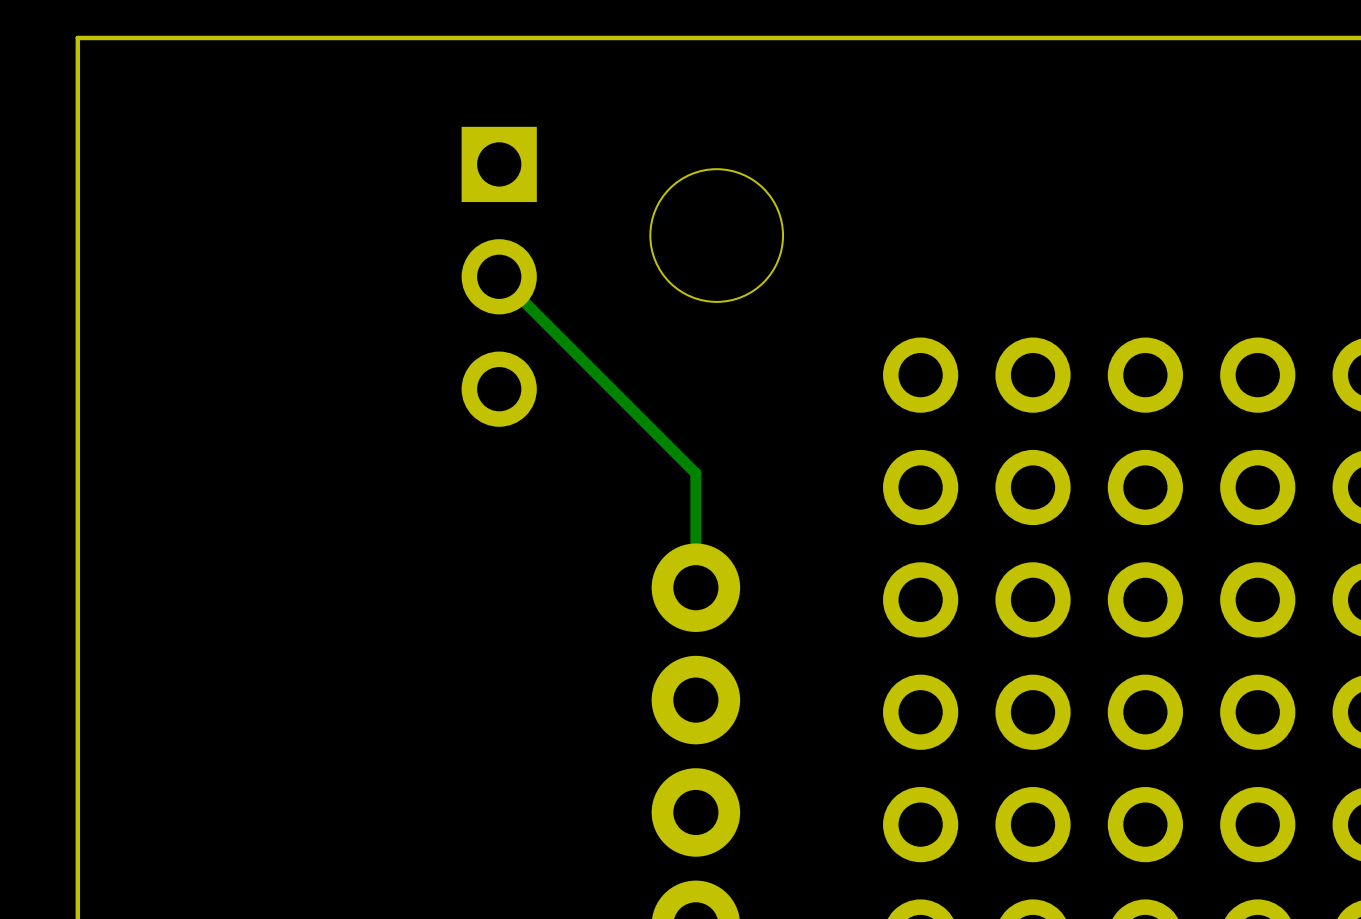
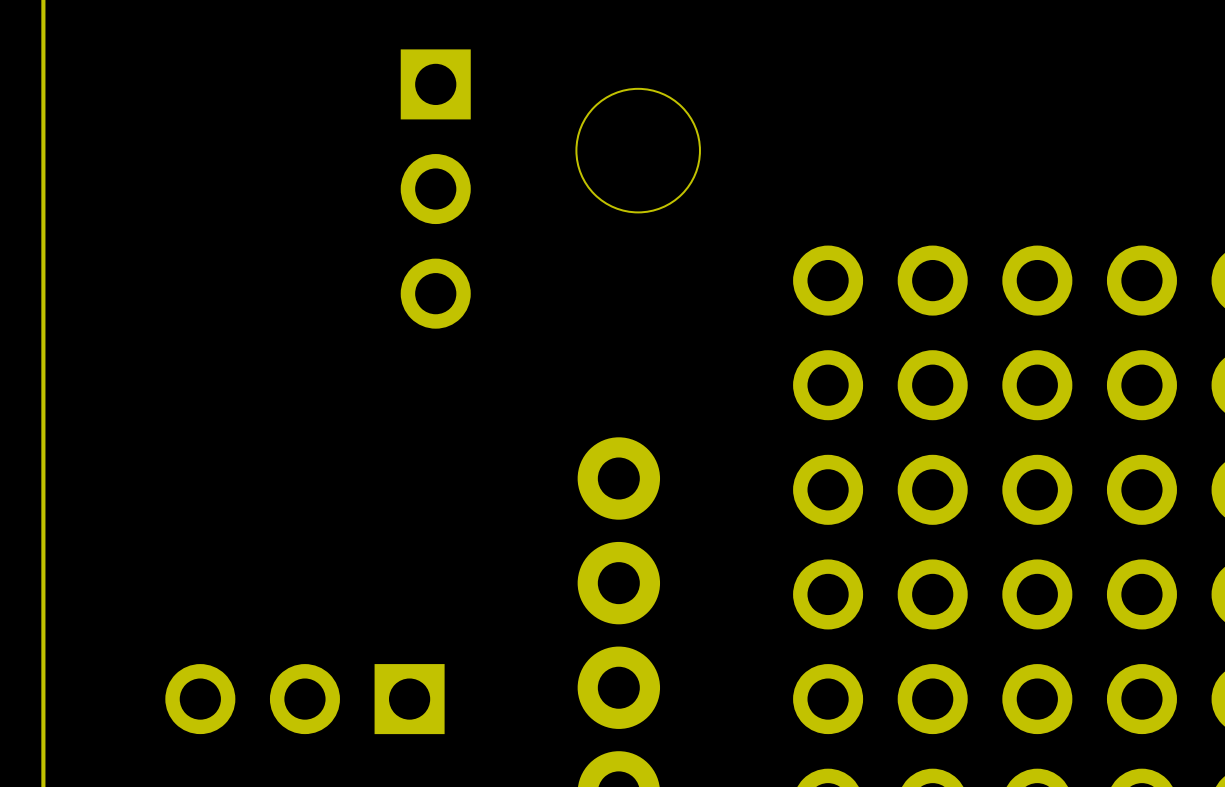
track: (499, 276) (695, 473) (695, 587) -> none
part: none -> (304, 699)

